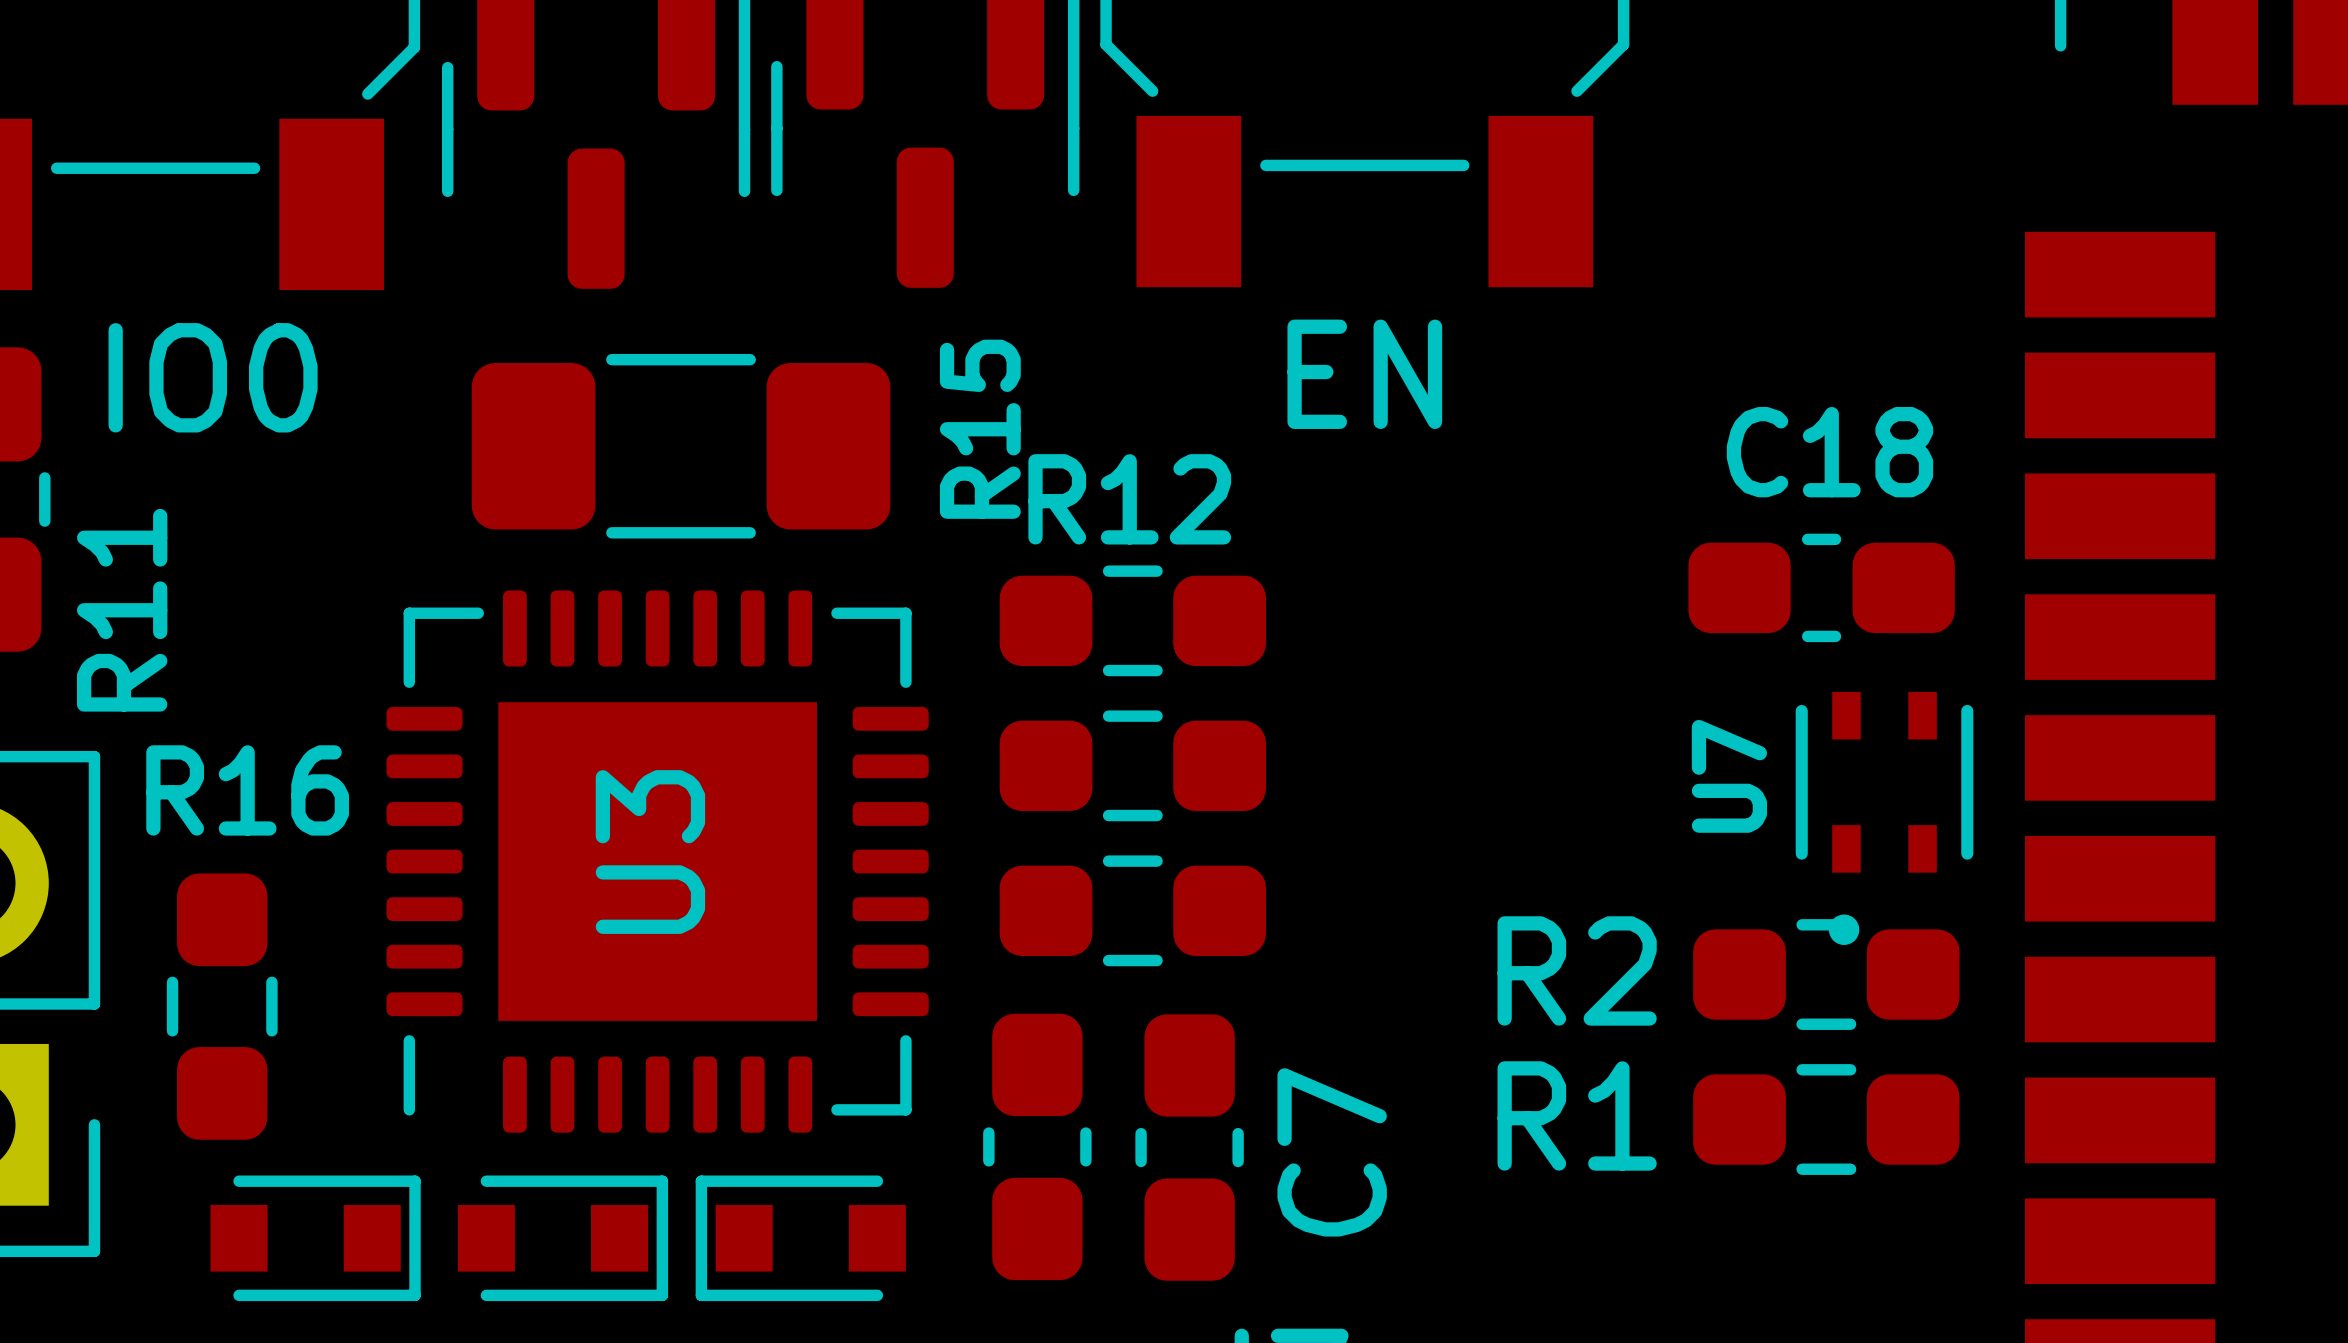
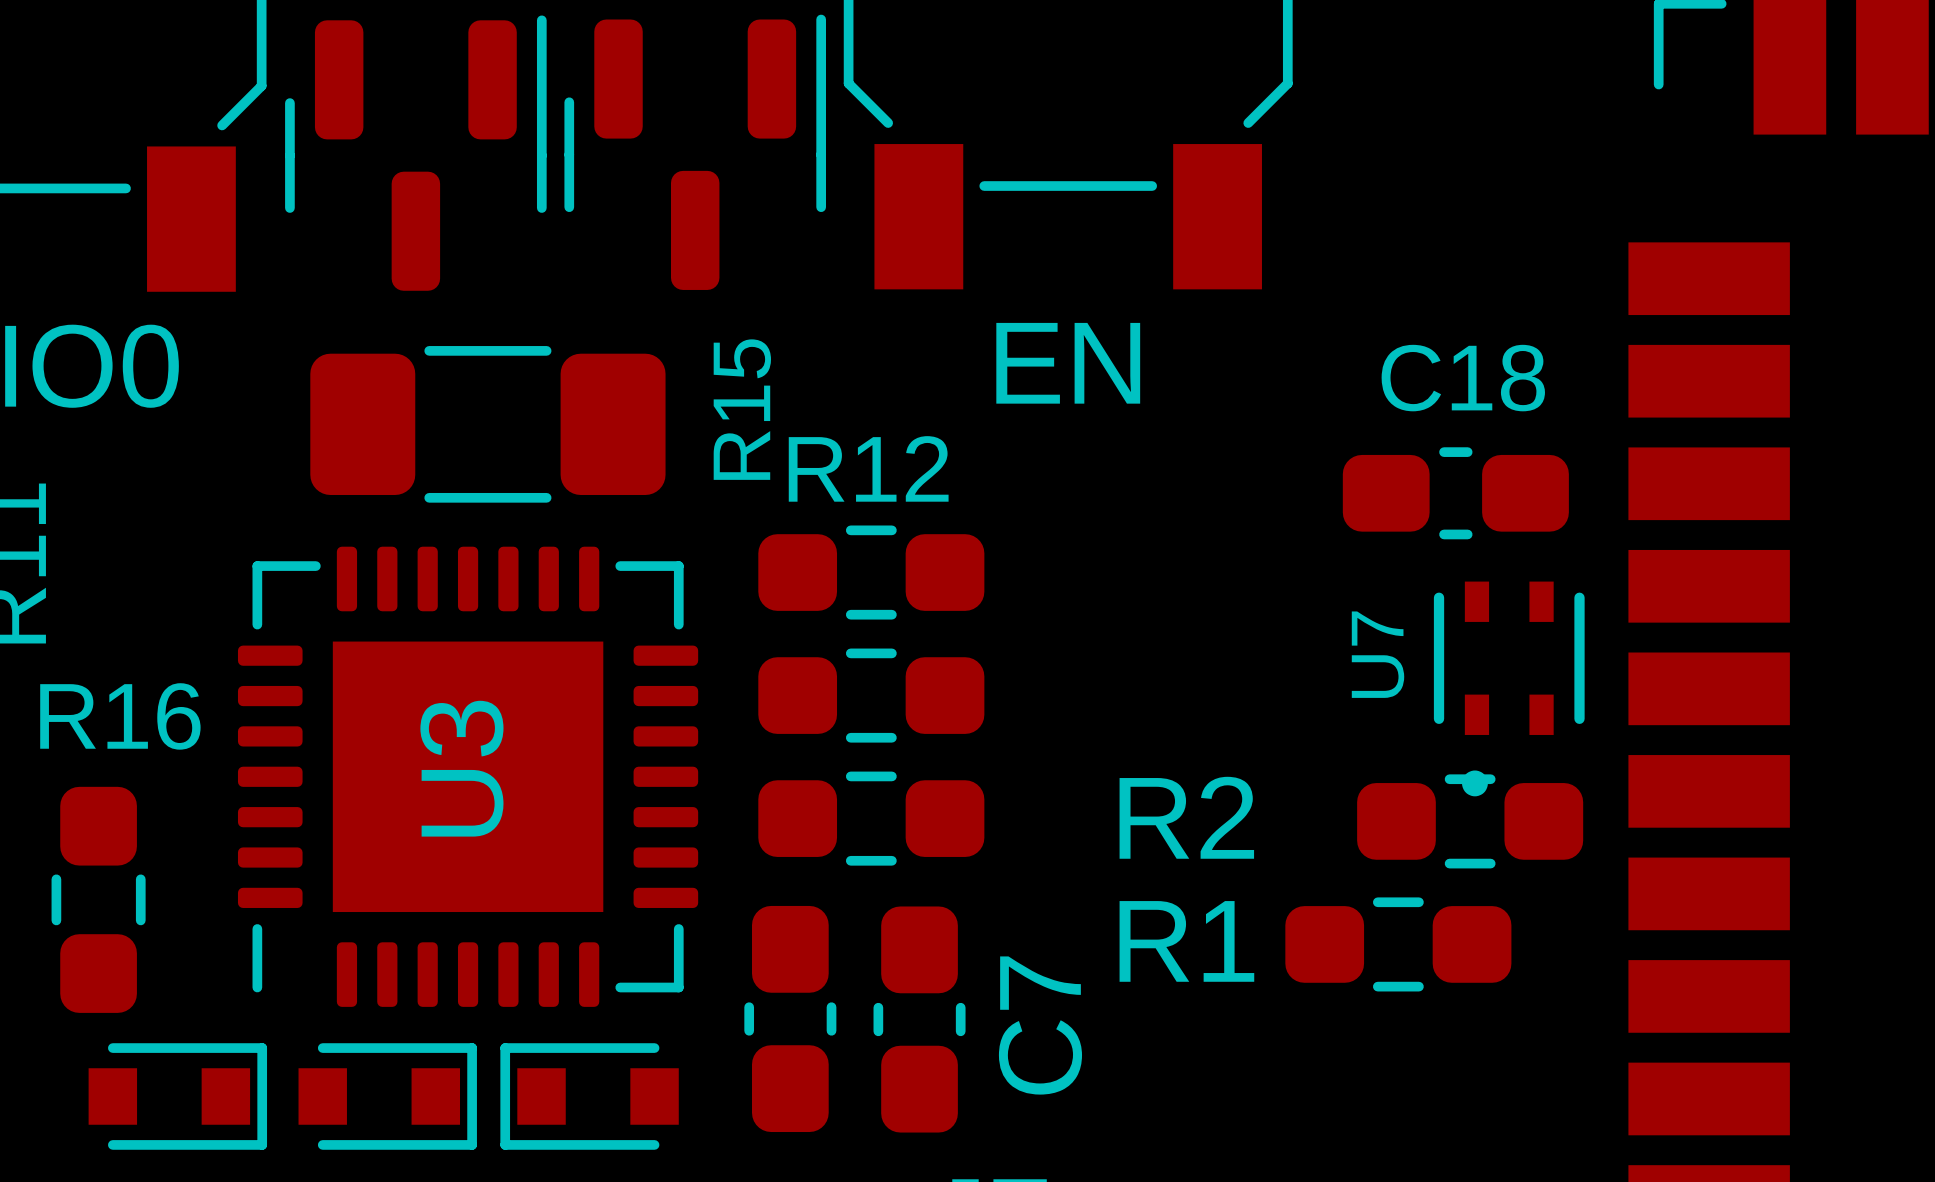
C18 position: (1821, 587) -> (1455, 493)
U7 position: (1884, 818) -> (1509, 688)
R2 name position: R2 (1577, 970) -> R2 (1186, 817)
R2 position: (1826, 974) -> (1470, 821)
R1 position: (1826, 1119) -> (1398, 944)

